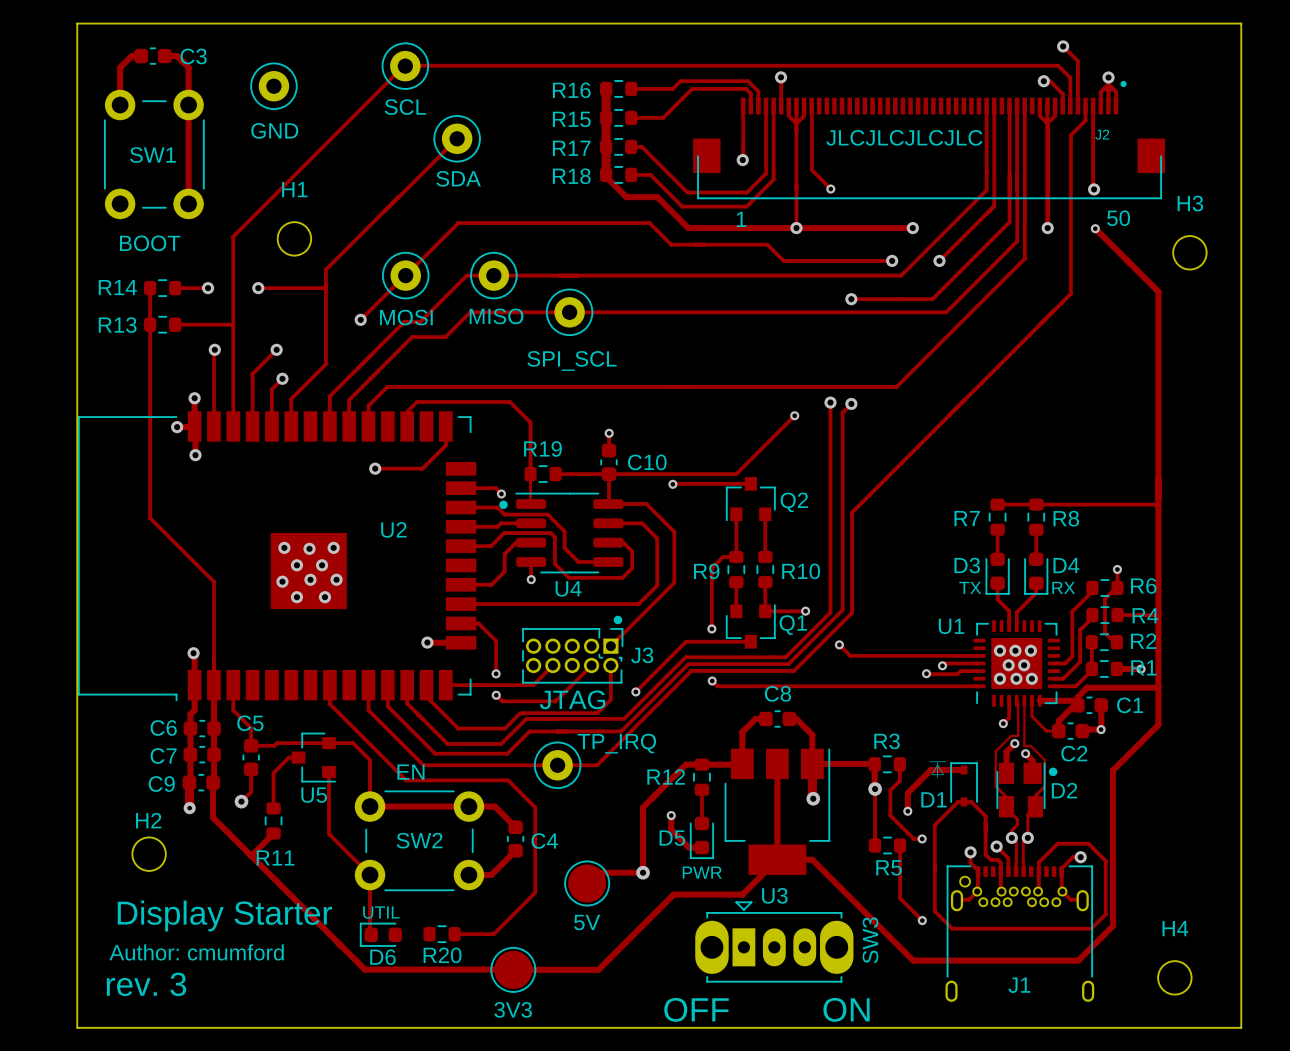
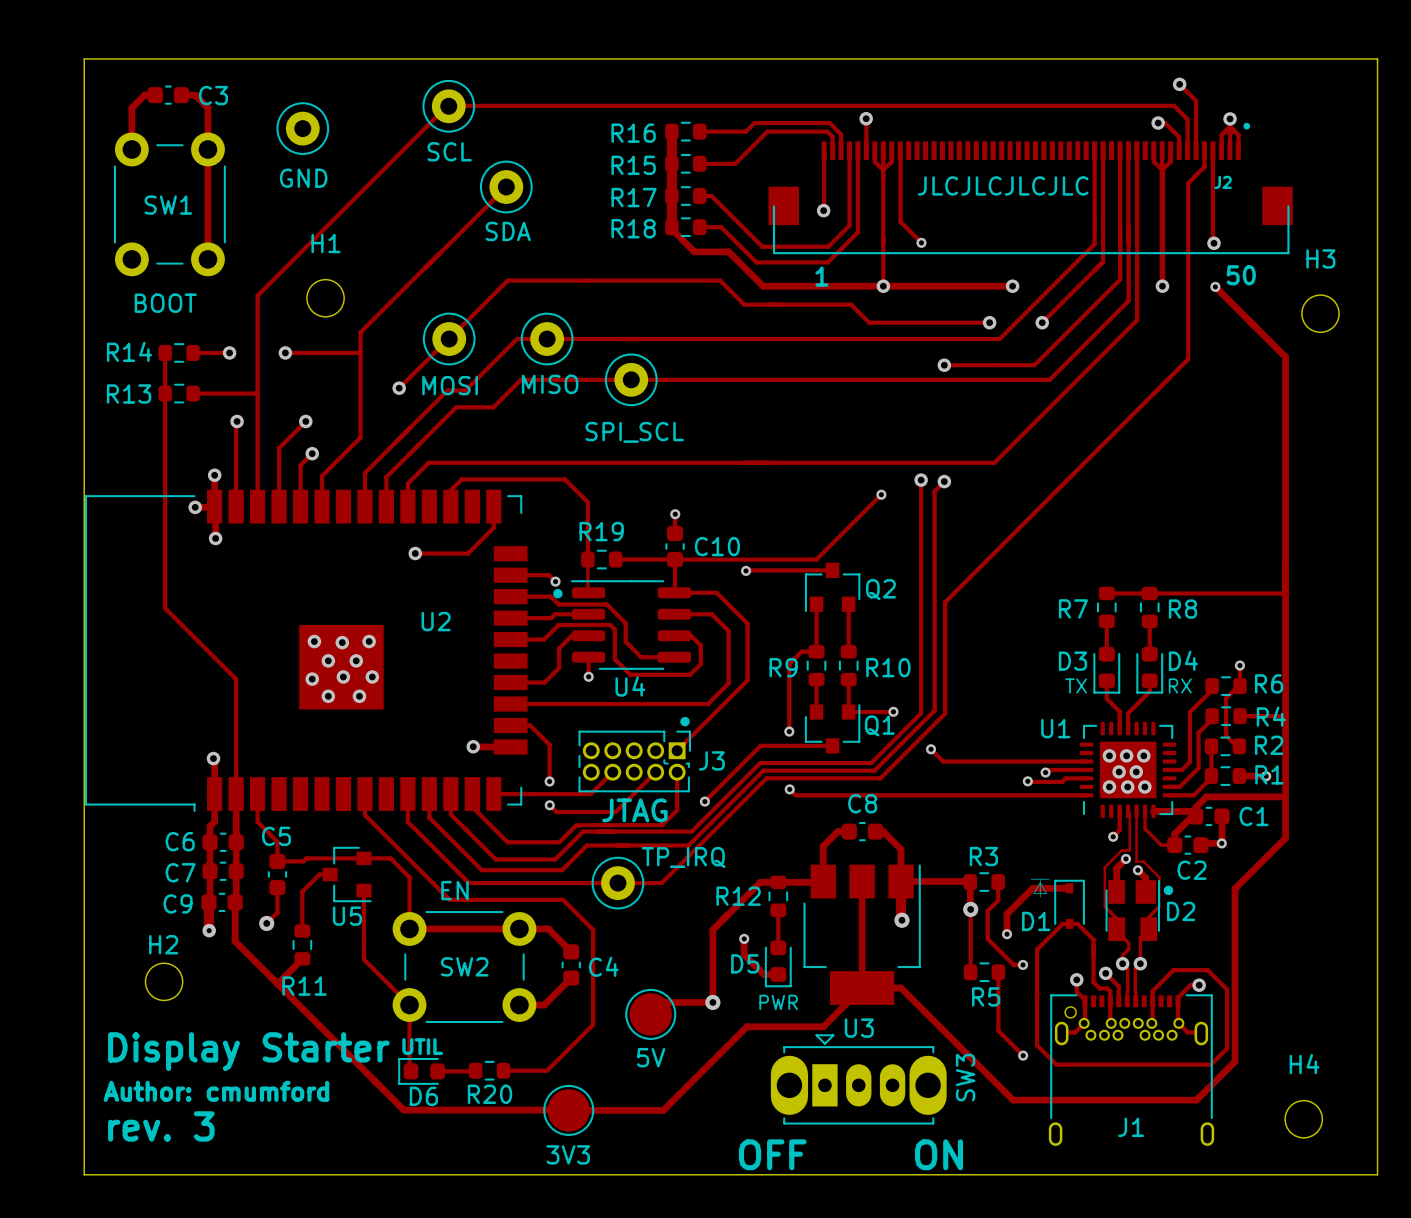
track: none -> (475, 1070) (437, 1071)

